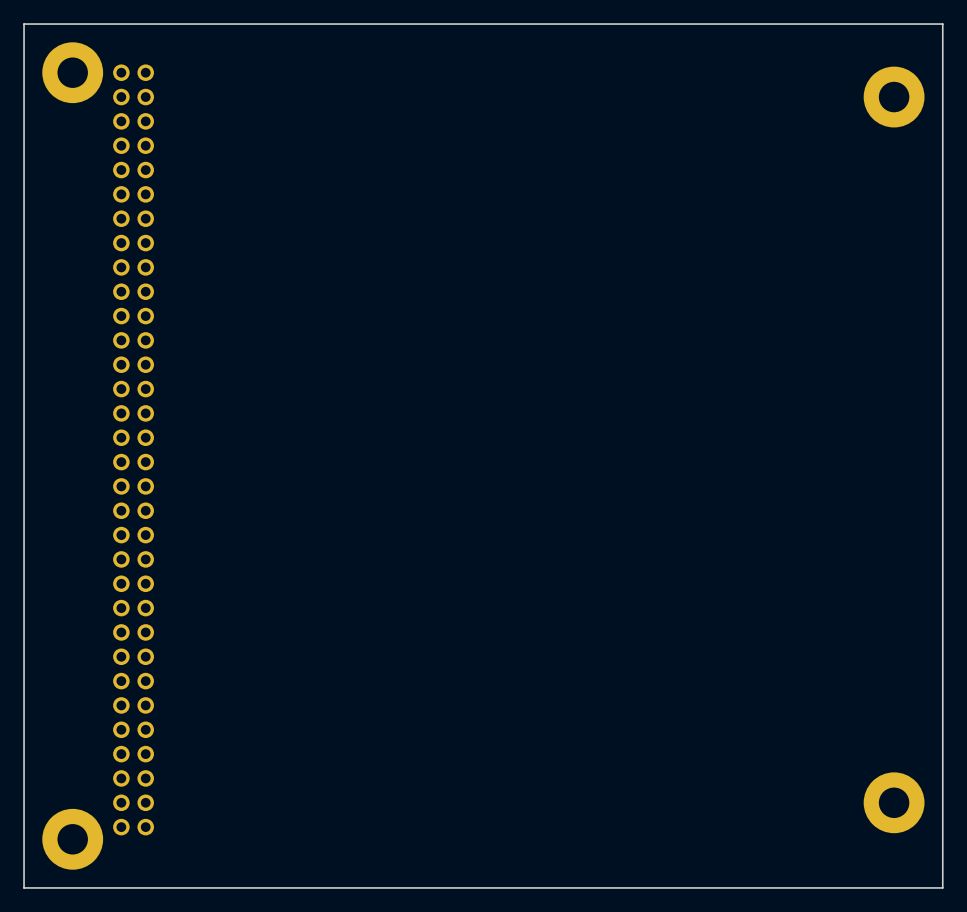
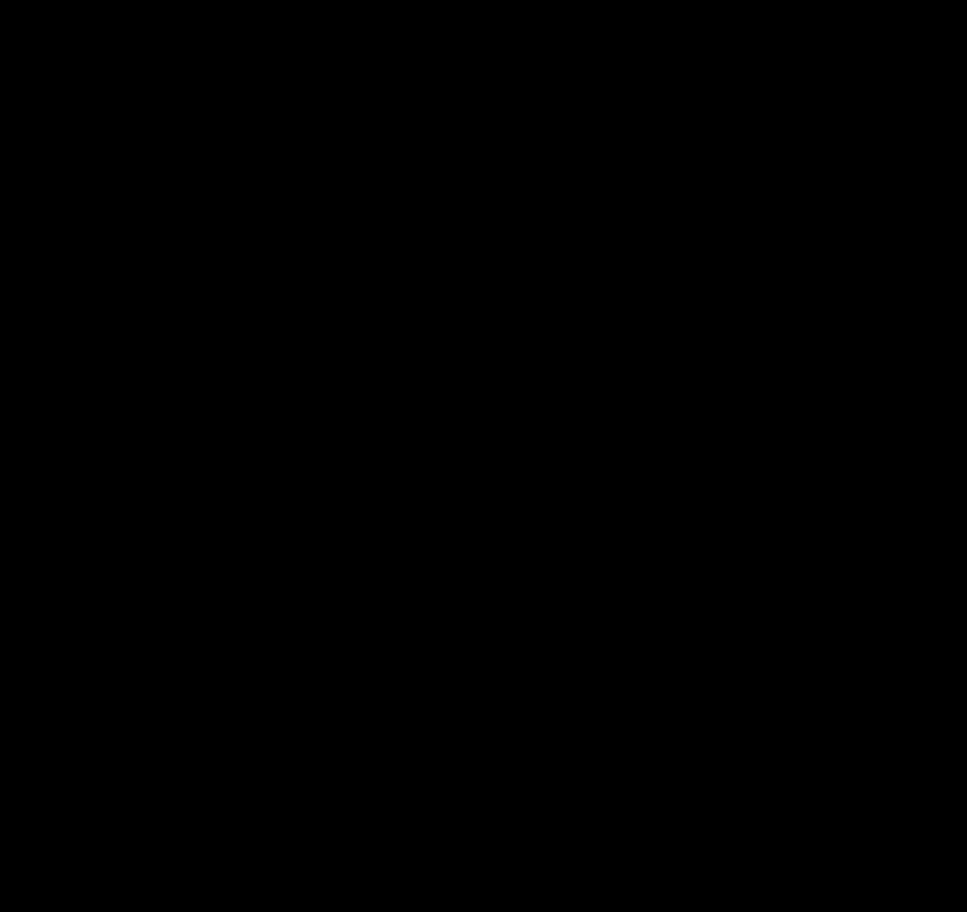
board edge: (942, 24) (942, 887) (24, 887) (24, 24) (942, 24) -> none
part: (72, 72) -> none
part: (894, 97) -> none
part: (133, 449) -> none
part: (894, 802) -> none
part: (72, 839) -> none

